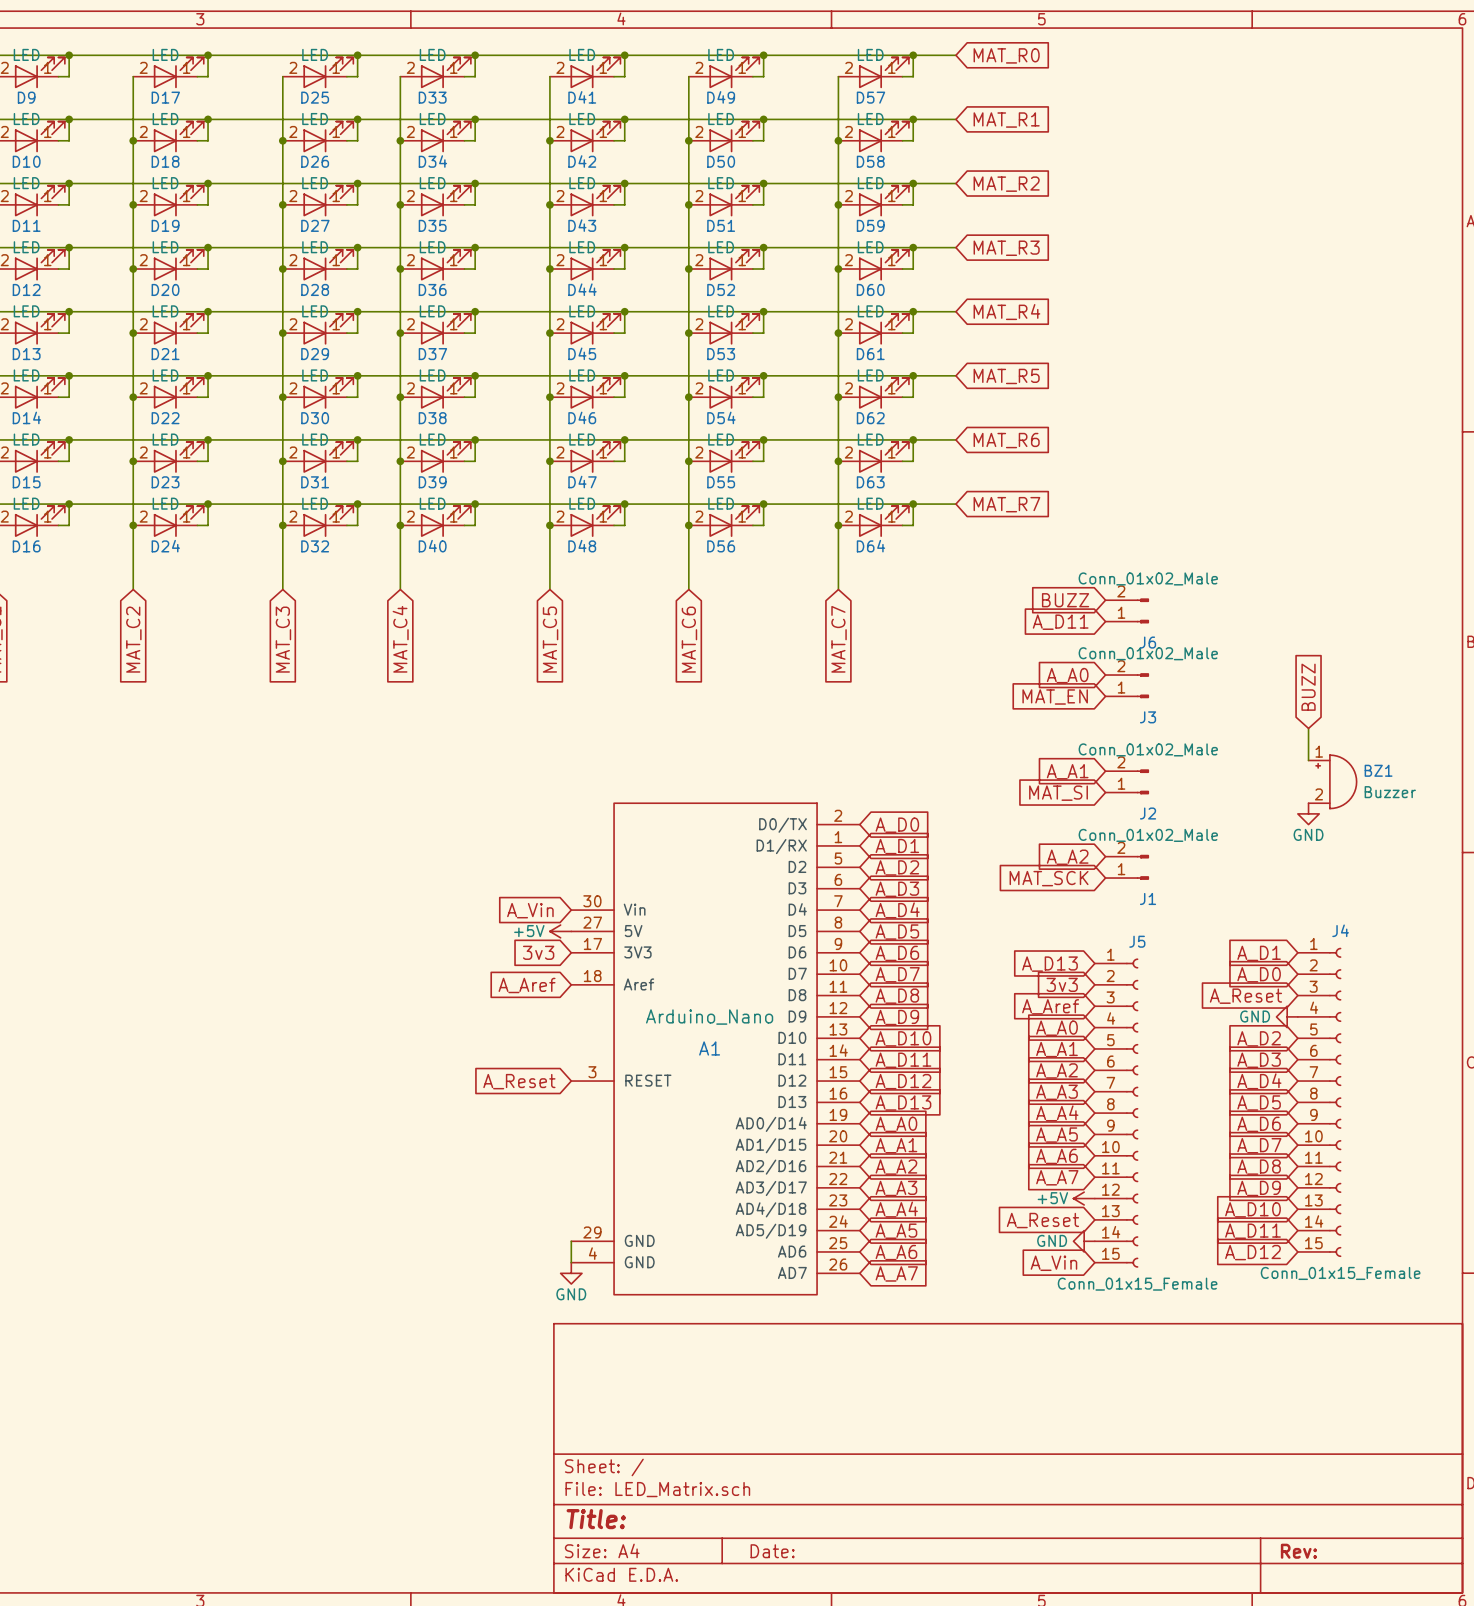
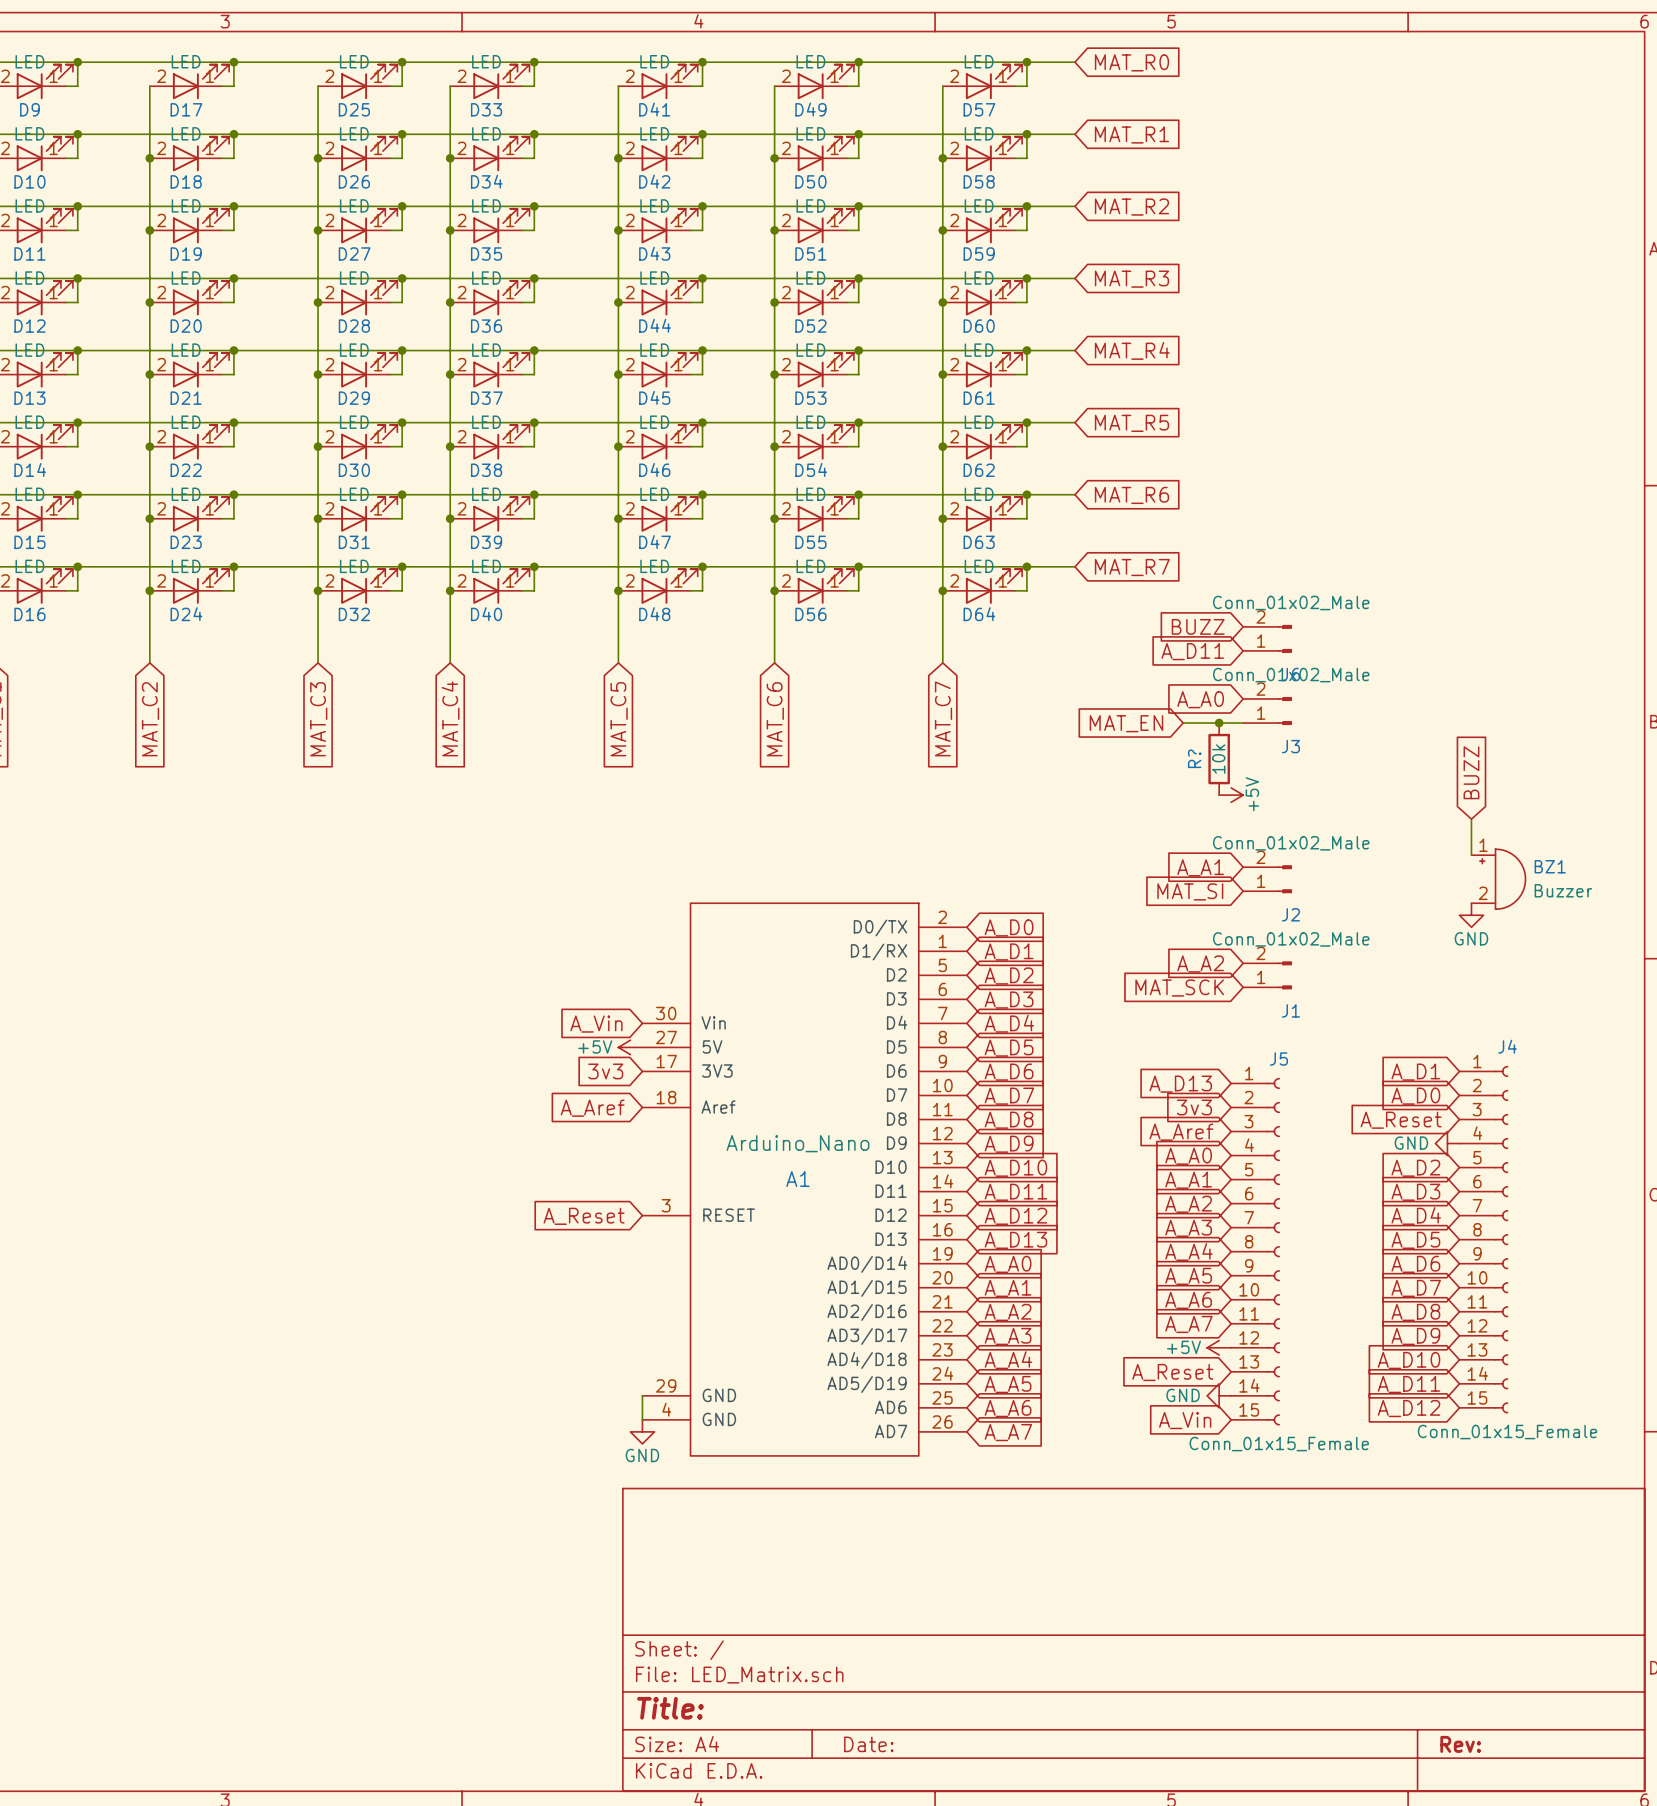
global label: none -> A_D11 (1192, 651)
global label position: BUZZ (1065, 600) -> BUZZ (1198, 626)
J6 position: (1127, 610) -> (1267, 638)
global label: A_D11 (1060, 622) -> A_A0 (1200, 699)
wire: none -> (1183, 723) (1243, 723)
junction: none -> (1219, 723)
global label: A_A0 (1067, 675) -> none
R?: none -> 10k (1219, 759)
J3 position: (1127, 685) -> (1267, 711)
global label position: MAT_EN (1055, 696) -> MAT_EN (1126, 723)
power symbol: none -> +5V (1231, 795)

